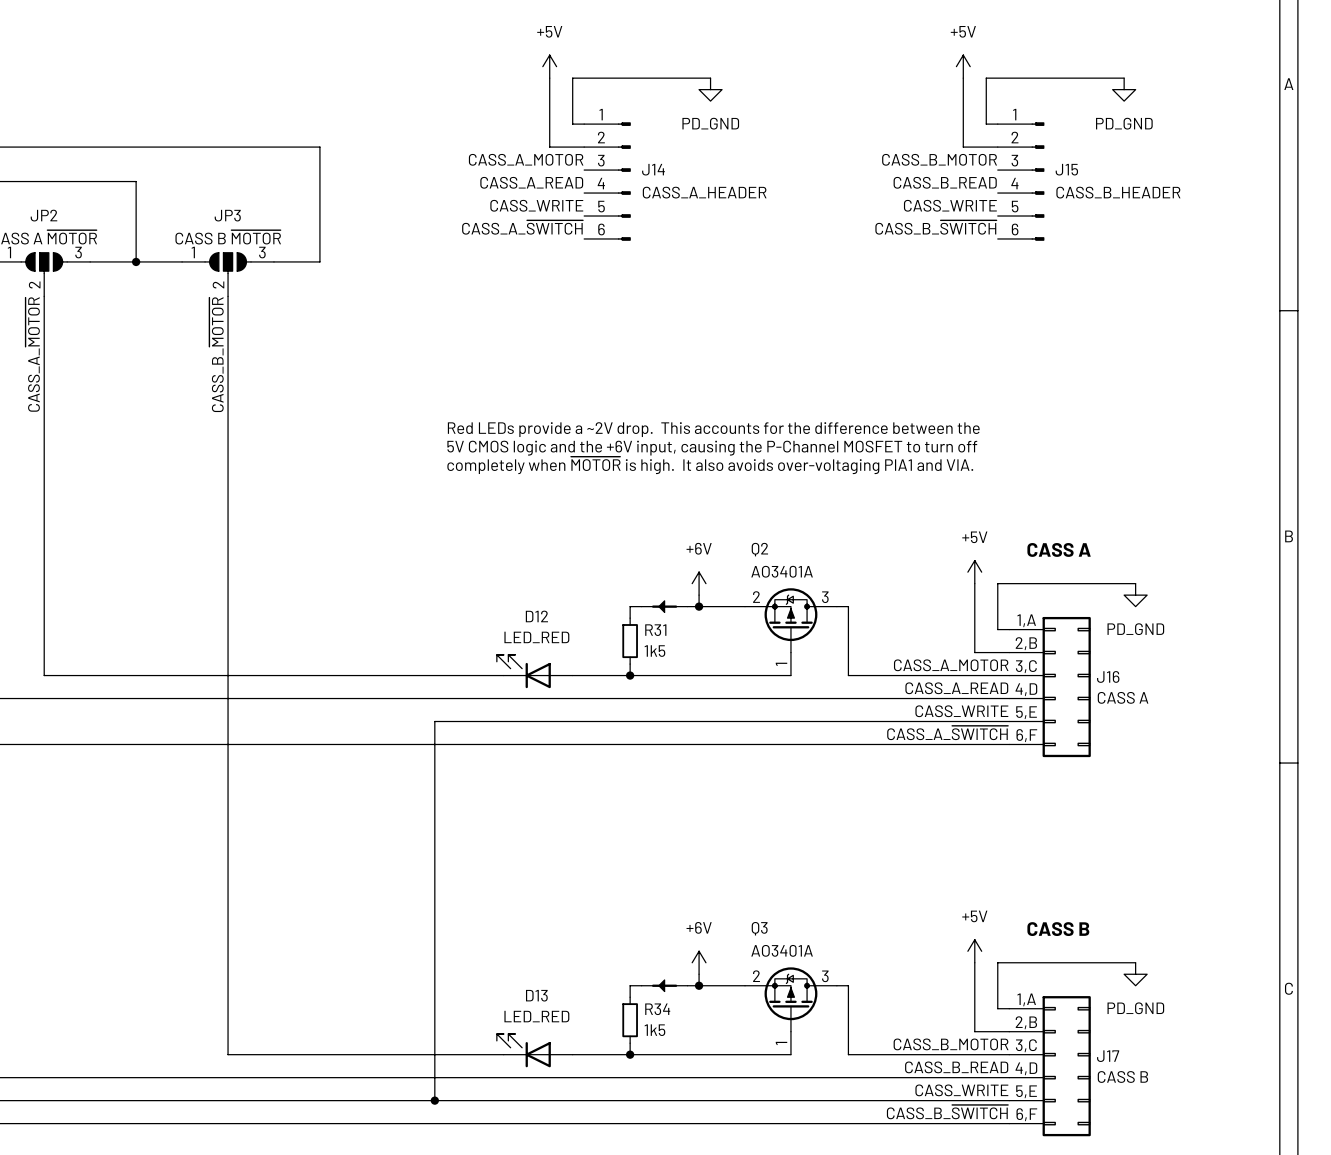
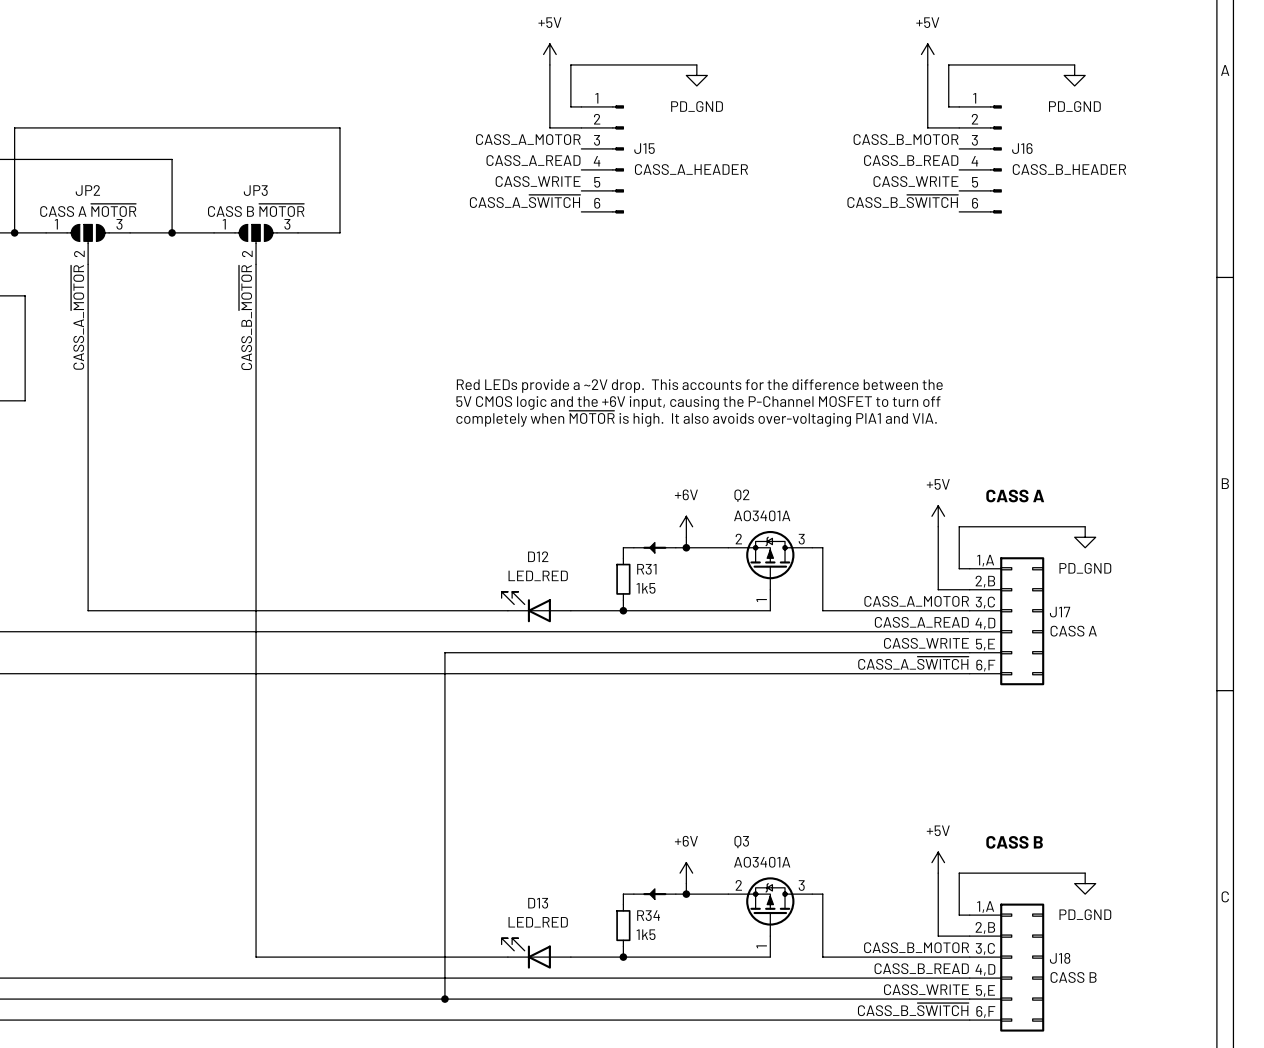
J14 name: J14 (653, 169) -> J15 (644, 148)
J15 name: J15 (1066, 169) -> J16 (1022, 148)
J16 name: J16 (1108, 676) -> J17 (1060, 612)
J17 name: J17 (1108, 1056) -> J18 (1060, 958)

